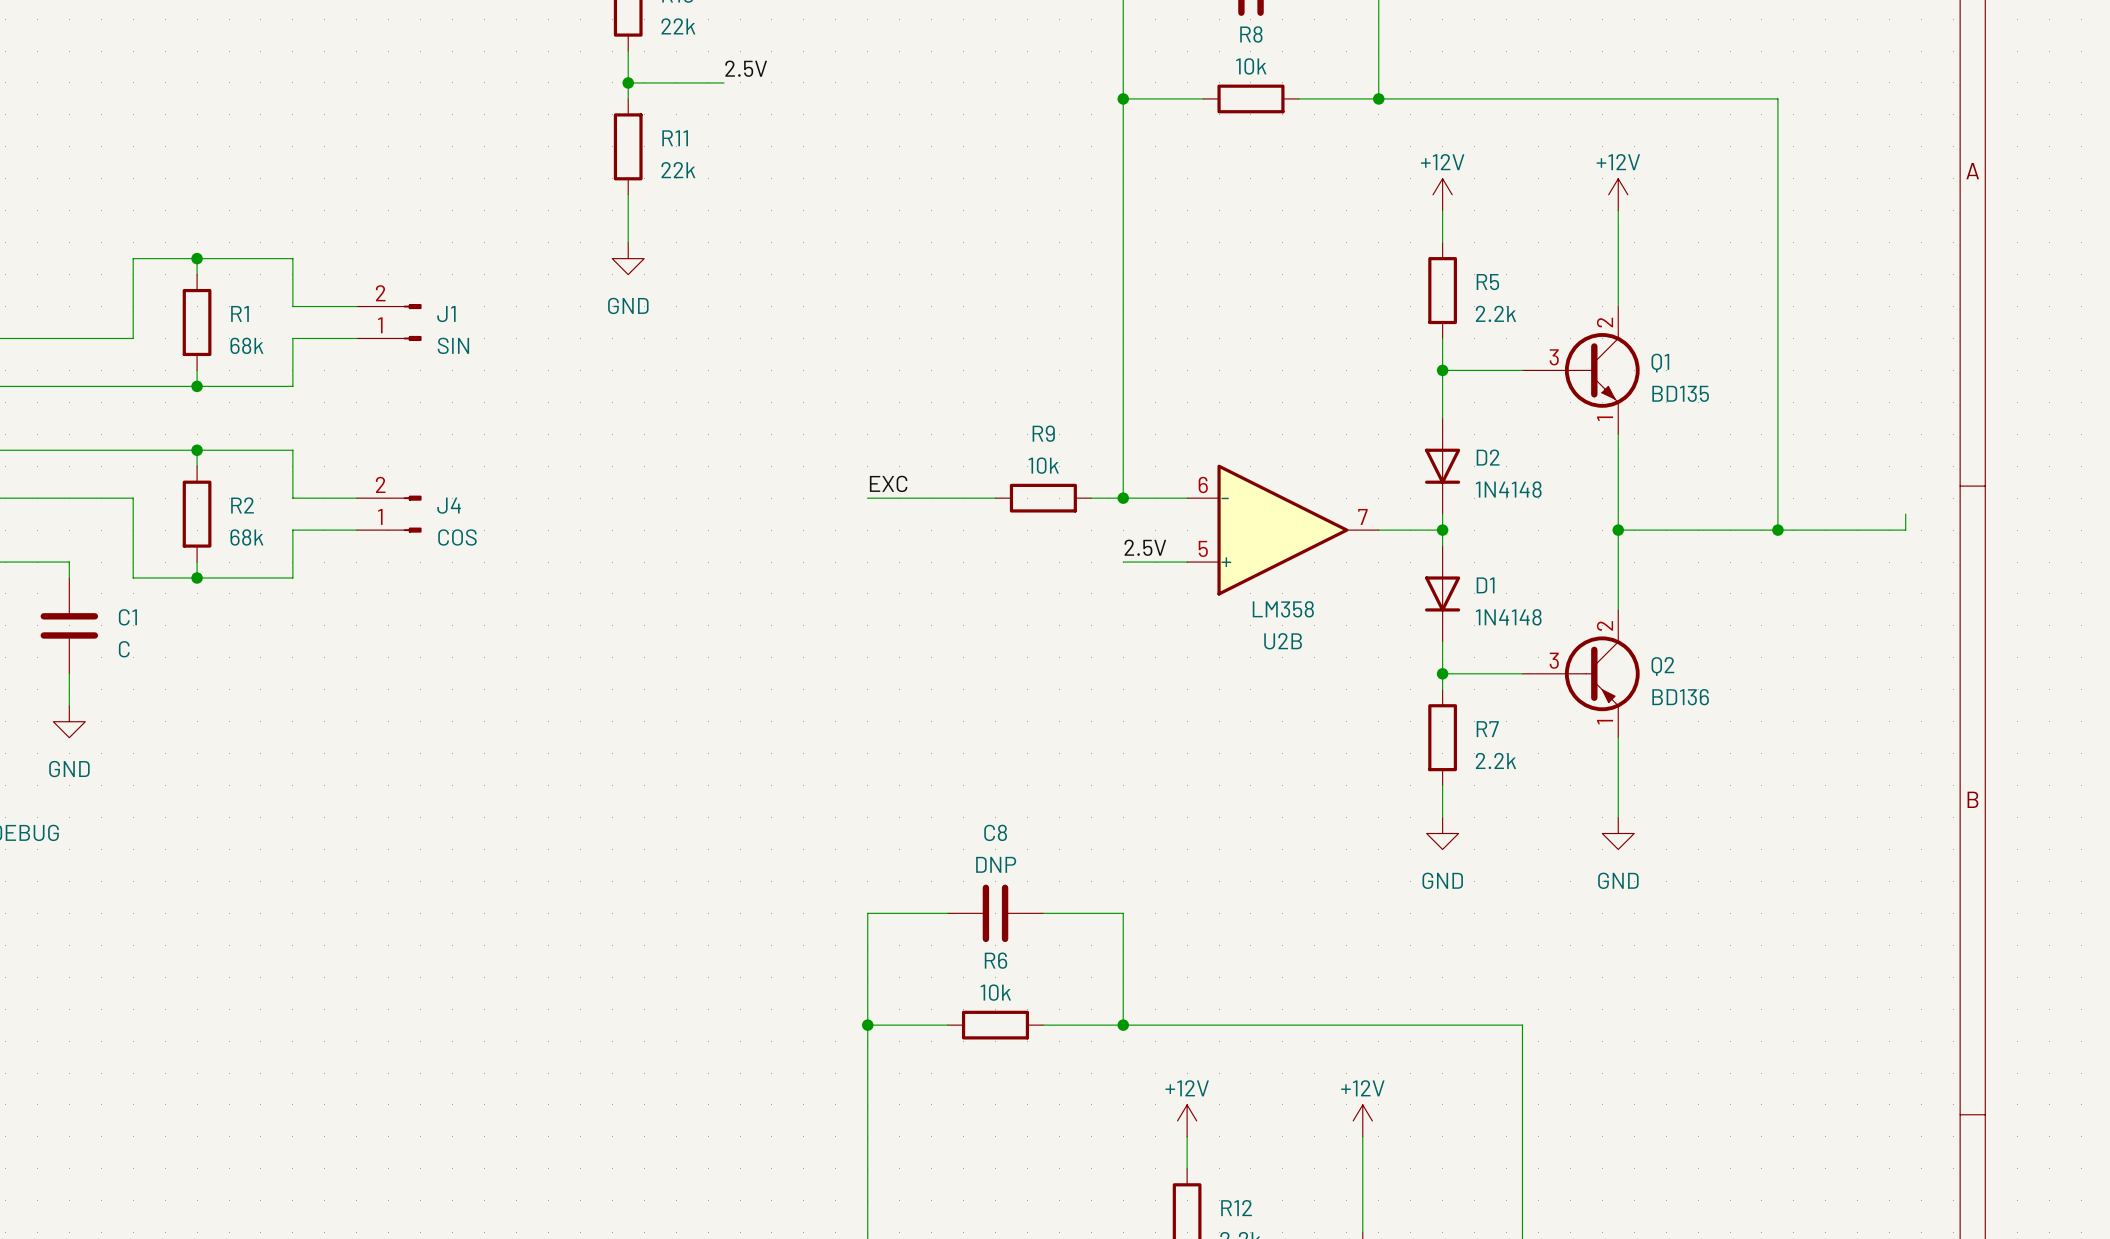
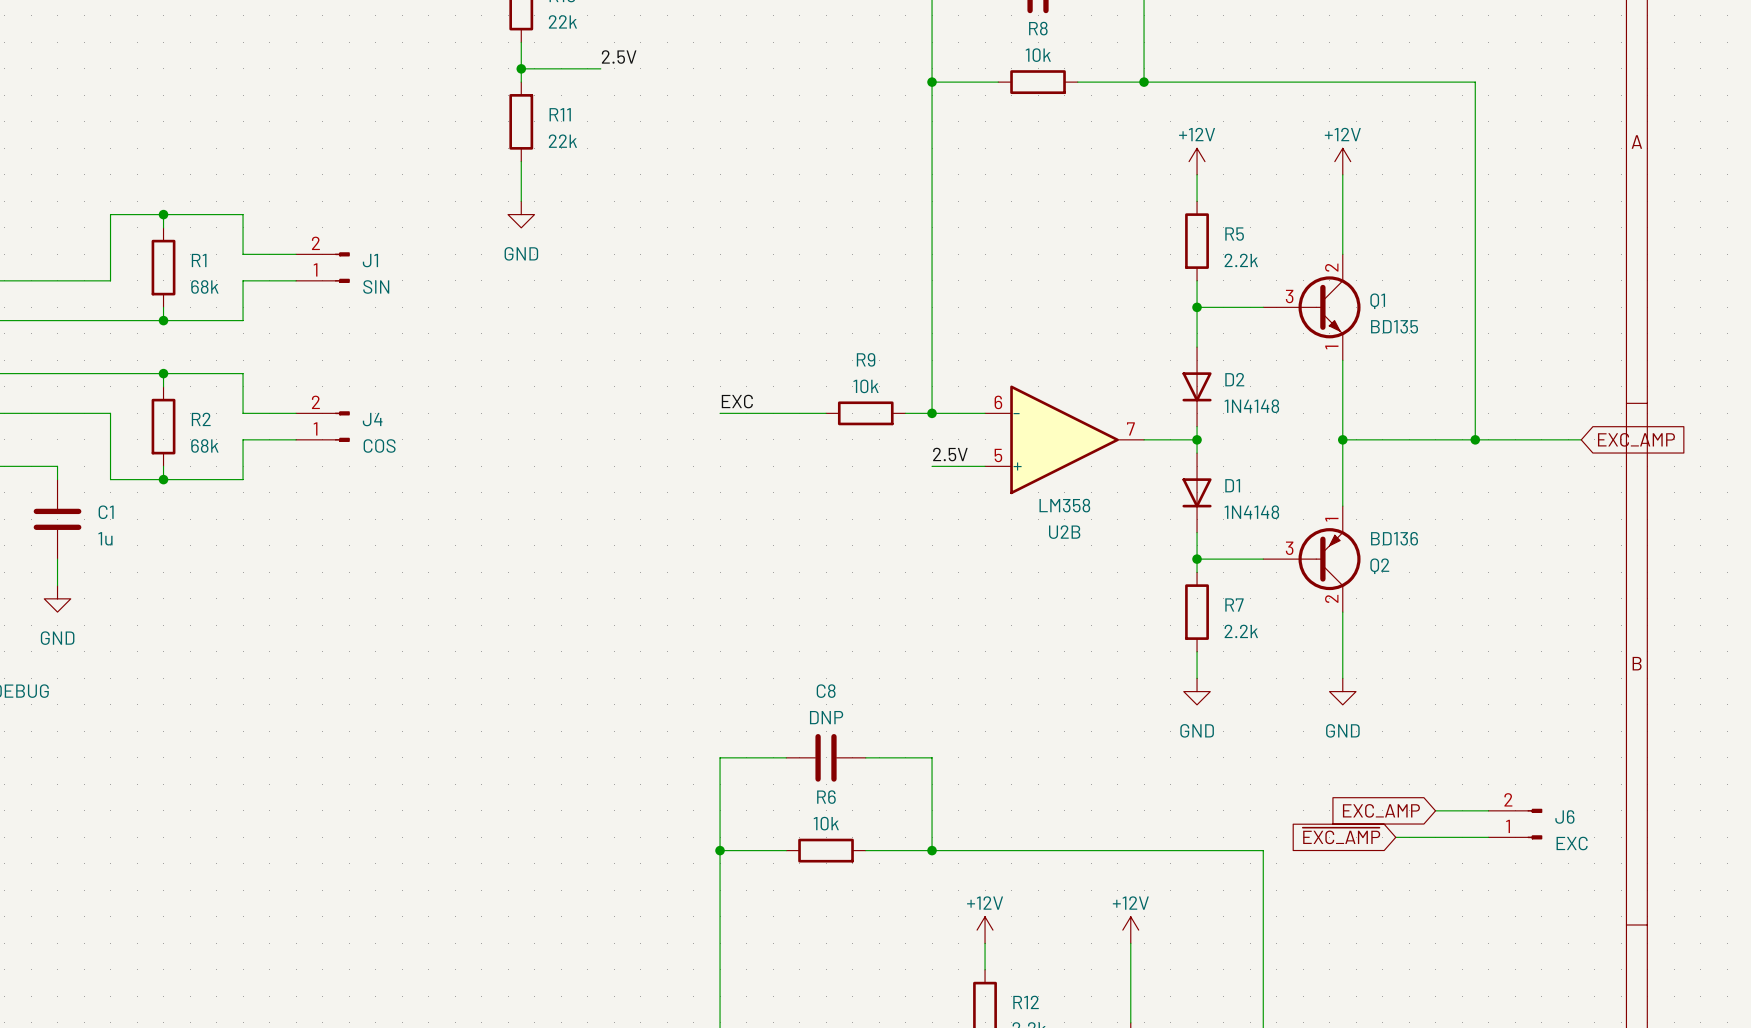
wire: (1905, 514) (1905, 530) -> none
global label: none -> EXC_AMP (1636, 439)
C1 value: C (124, 649) -> 1u (105, 538)
Q2 flip: as is (1602, 673) -> up-down (1329, 559)
global label: none -> EXC_AMP (1381, 810)
wire: none -> (1435, 810) (1488, 810)
J6: none -> EXC (1515, 824)
global label: none -> ~{EXC_AMP} (1341, 835)
wire: none -> (1395, 837) (1488, 837)

